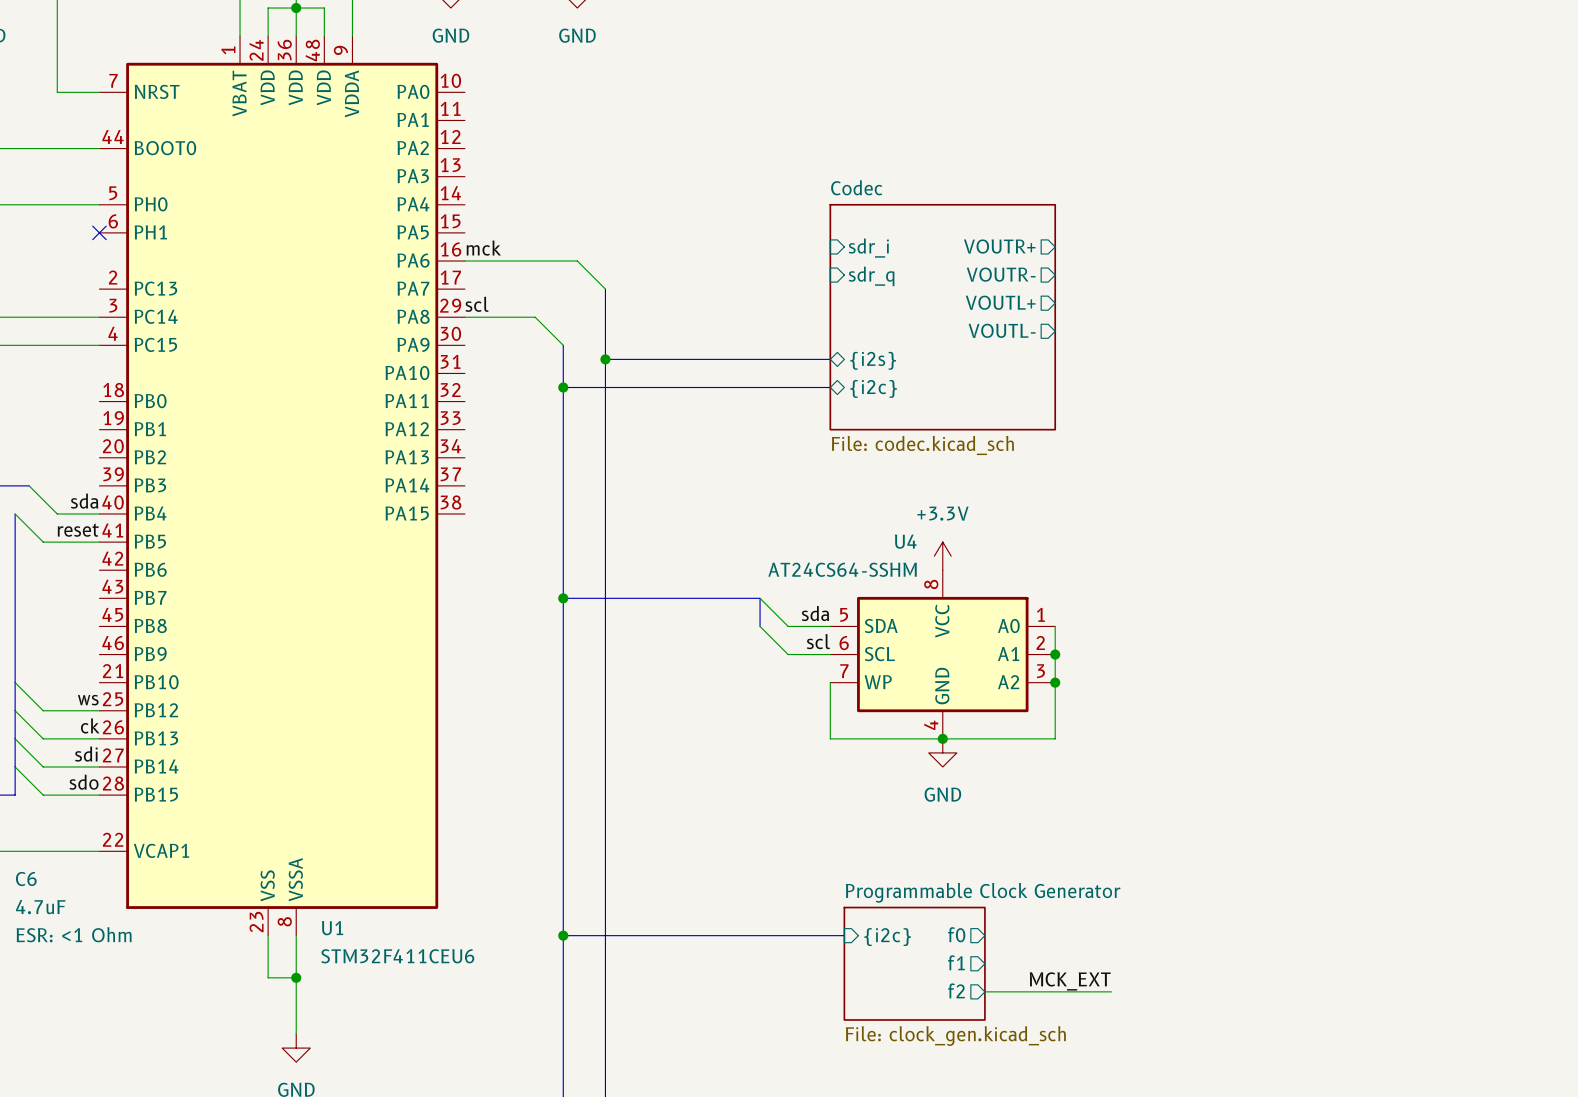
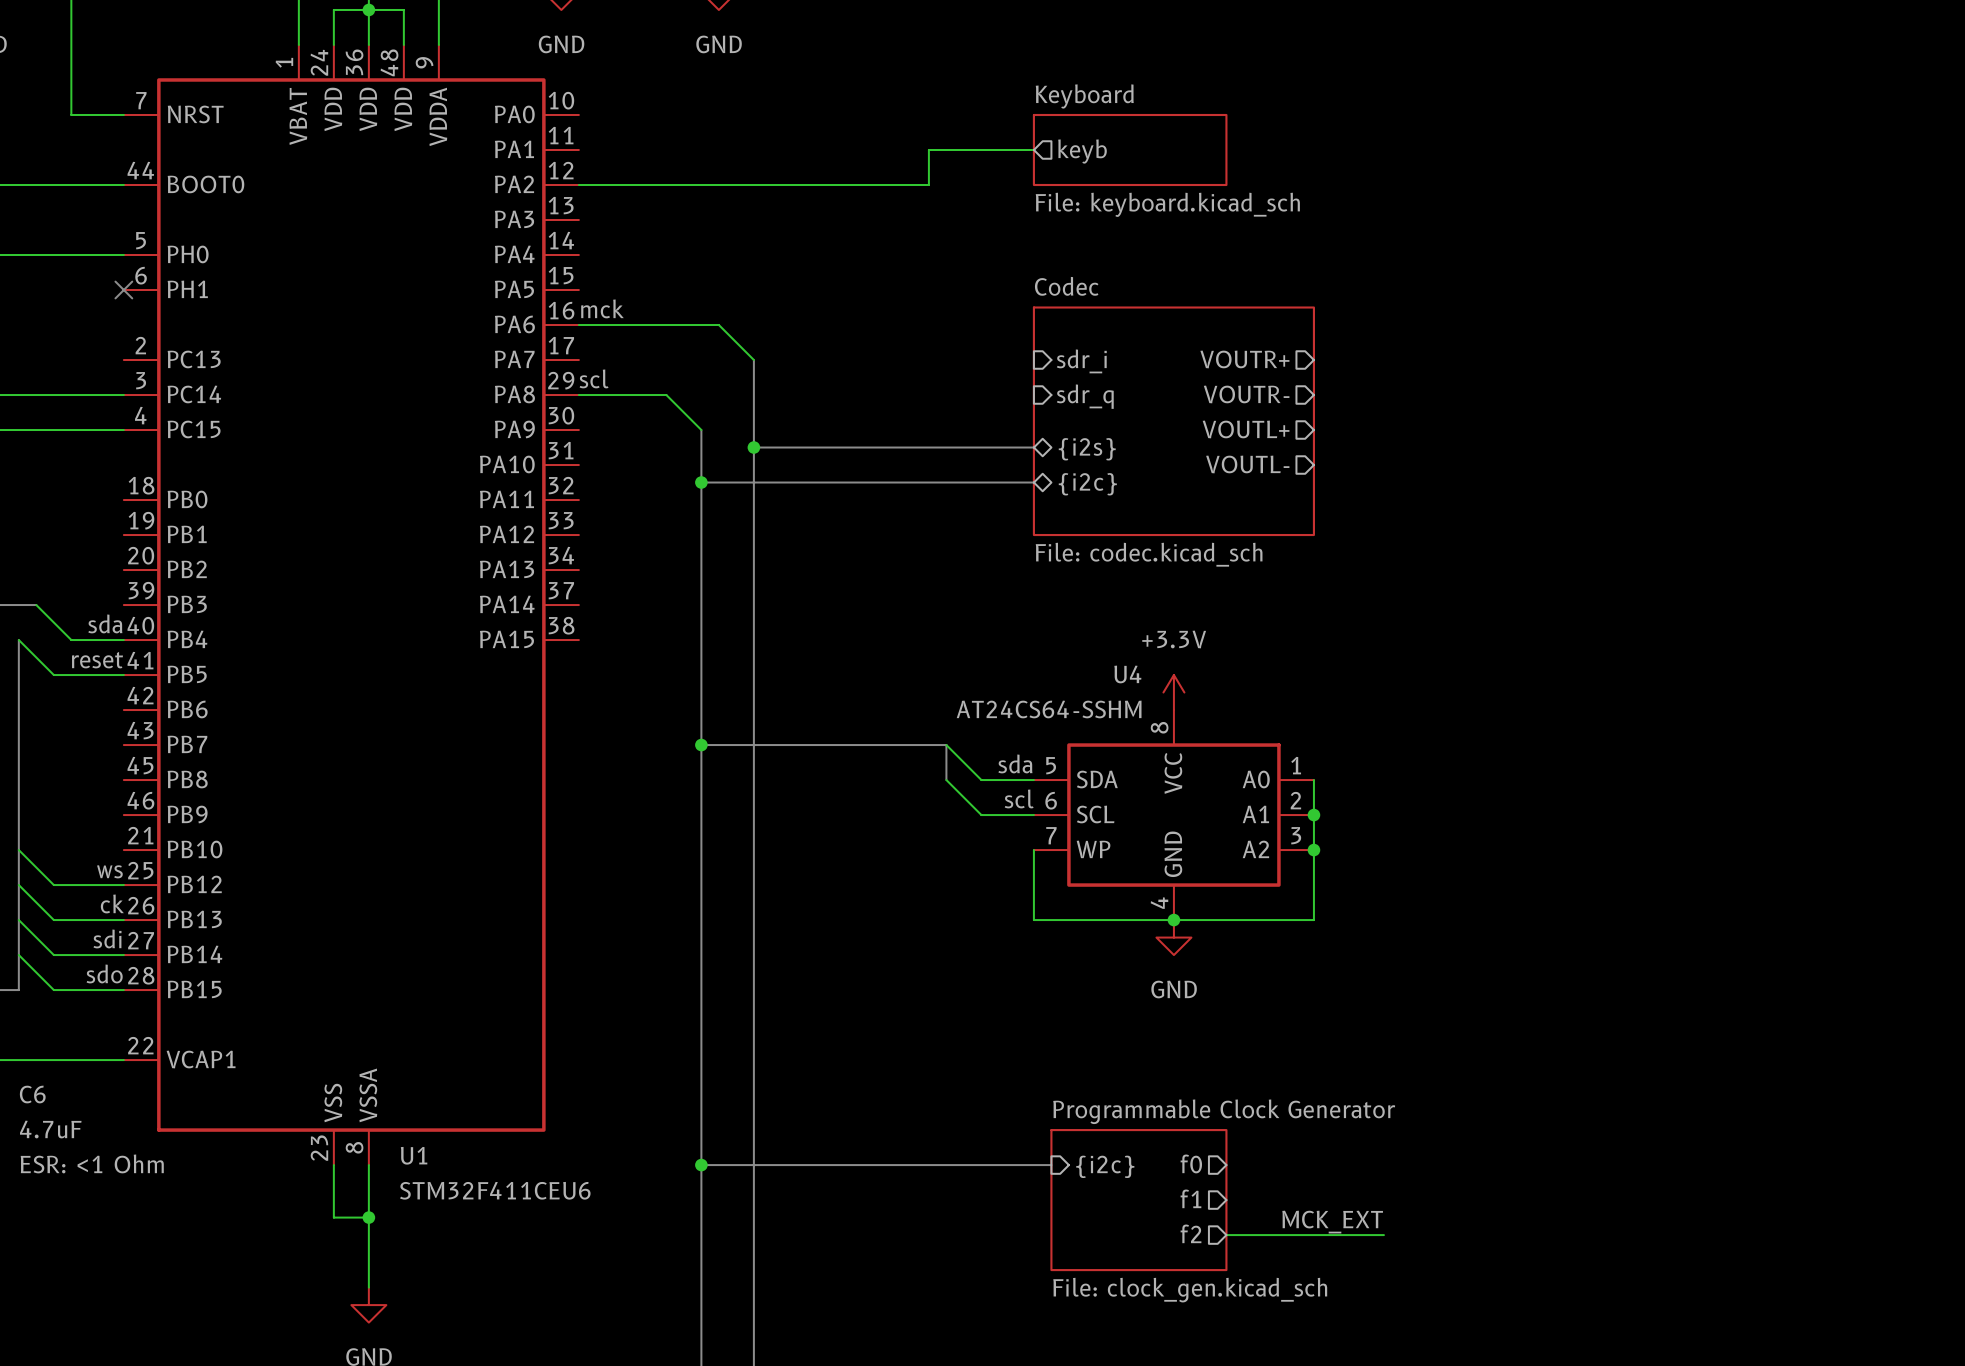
wire: none -> (1033, 149) (928, 149) (928, 184) (578, 184)
sheet Keyboard: none -> File: keyboard.kicad_sch (1130, 149)
sheet pin: none -> keyb (1082, 151)
sheet pin position: VOUTR+ (999, 246) -> VOUTR+ (1244, 359)
sheet pin position: sdr_i (868, 248) -> sdr_i (1081, 361)
sheet pin position: VOUTR- (1001, 274) -> VOUTR- (1246, 394)
sheet pin position: sdr_q (871, 276) -> sdr_q (1085, 396)
sheet pin position: VOUTL+ (1000, 302) -> VOUTL+ (1246, 429)
sheet Codec: File: codec.kicad_sch (942, 317) -> none
sheet pin position: VOUTL- (1002, 330) -> VOUTL- (1247, 464)
sheet Codec: none -> File: codec.kicad_sch (1173, 421)

